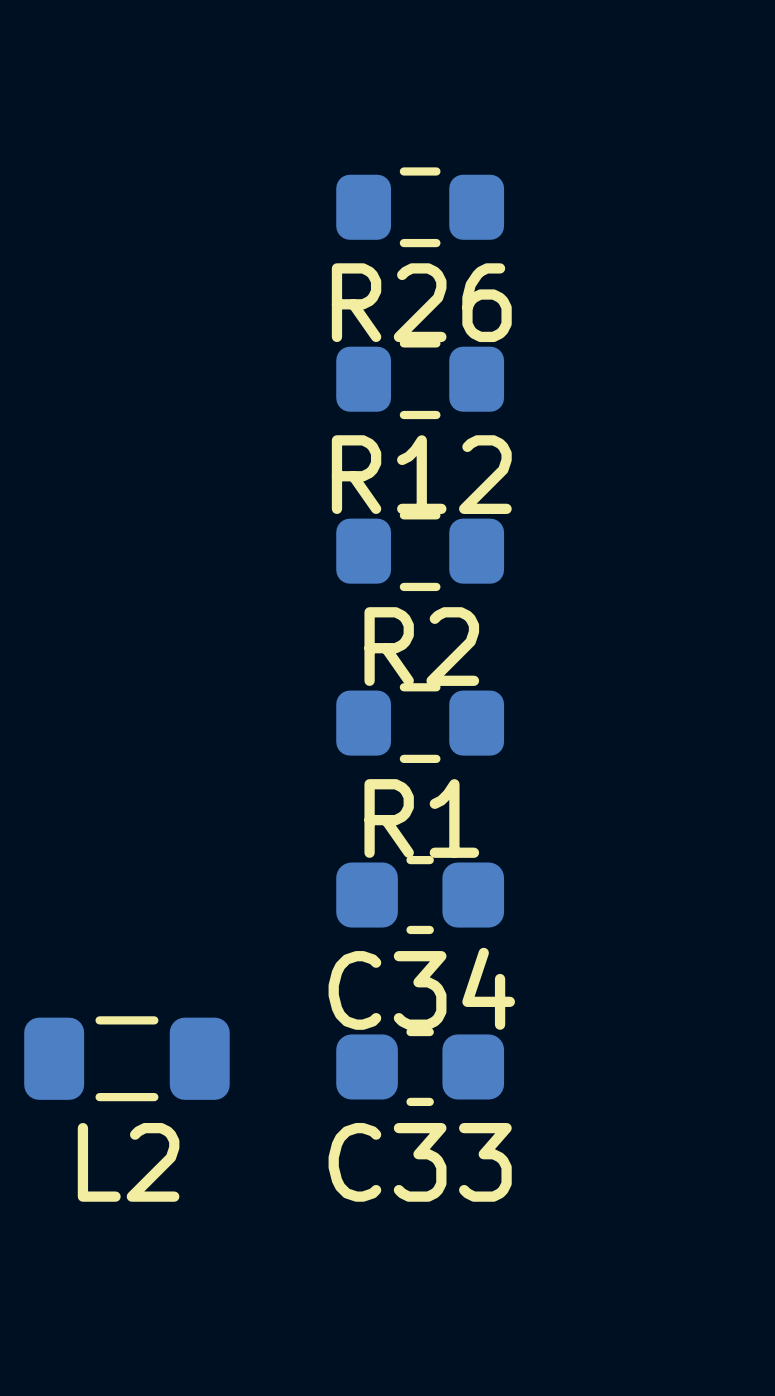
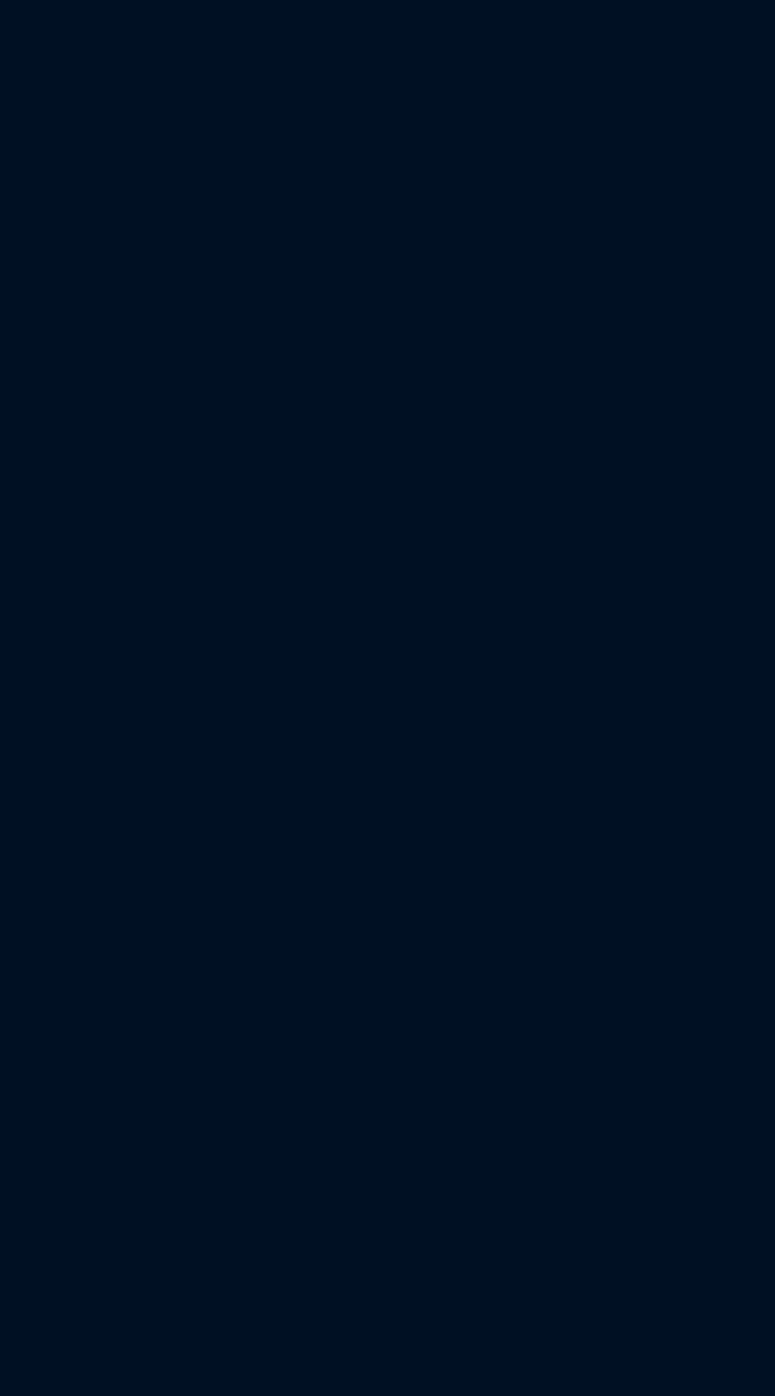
R26: (420, 207) -> none
R12: (420, 379) -> none
R2: (420, 551) -> none
R1: (420, 723) -> none
C34: (420, 895) -> none
L2: (126, 1058) -> none
C33: (420, 1066) -> none

